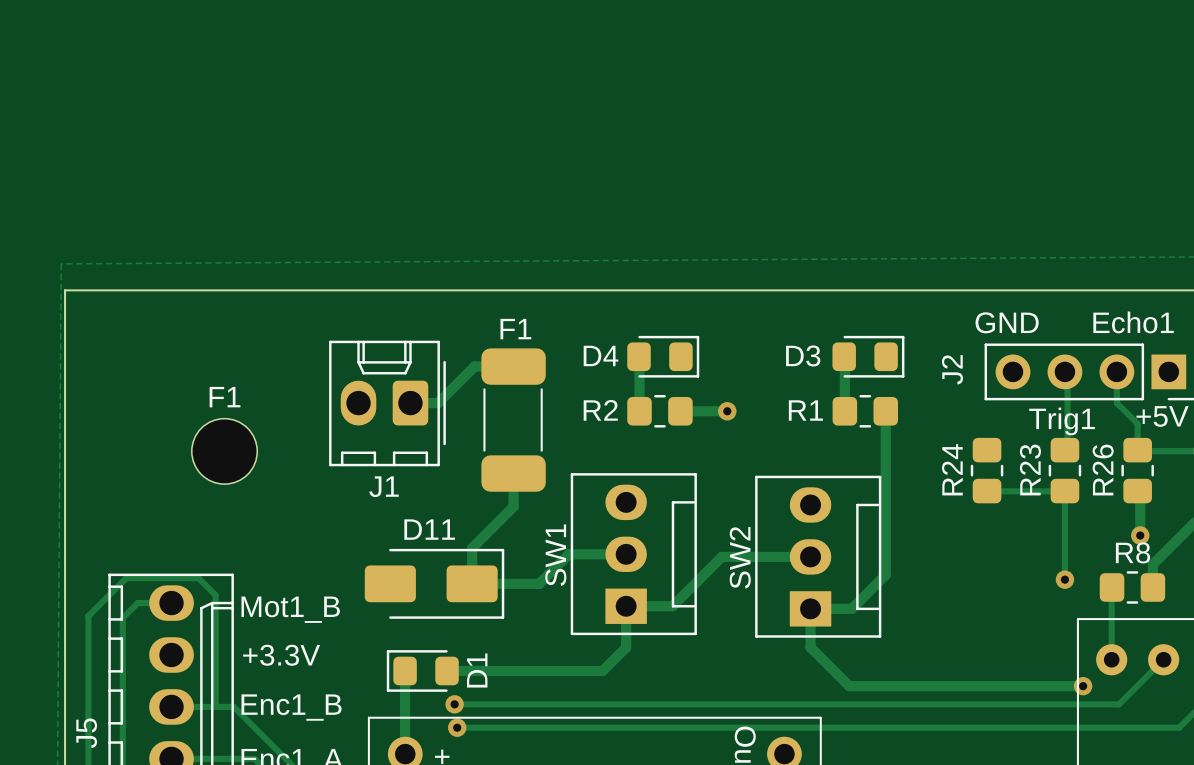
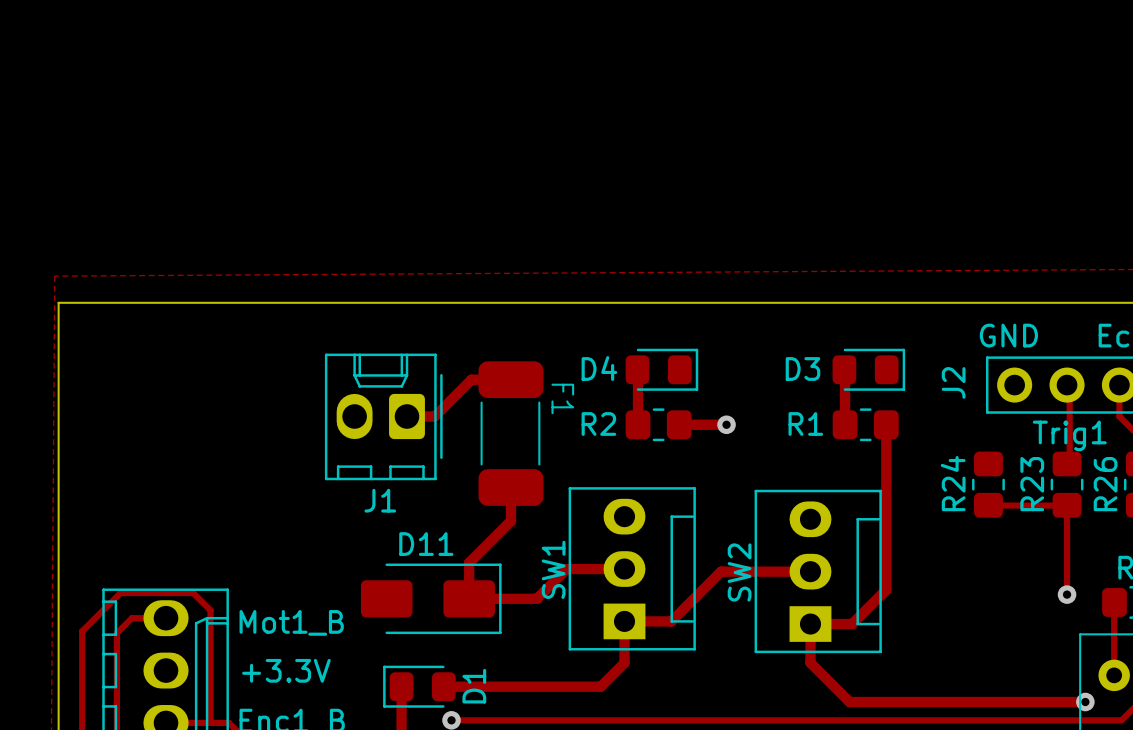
F1 name rotation: 0° (515, 329) -> 90° clockwise (562, 398)
F1 name position: F1 (515, 329) -> F1 (562, 398)
F1: (224, 451) -> none

